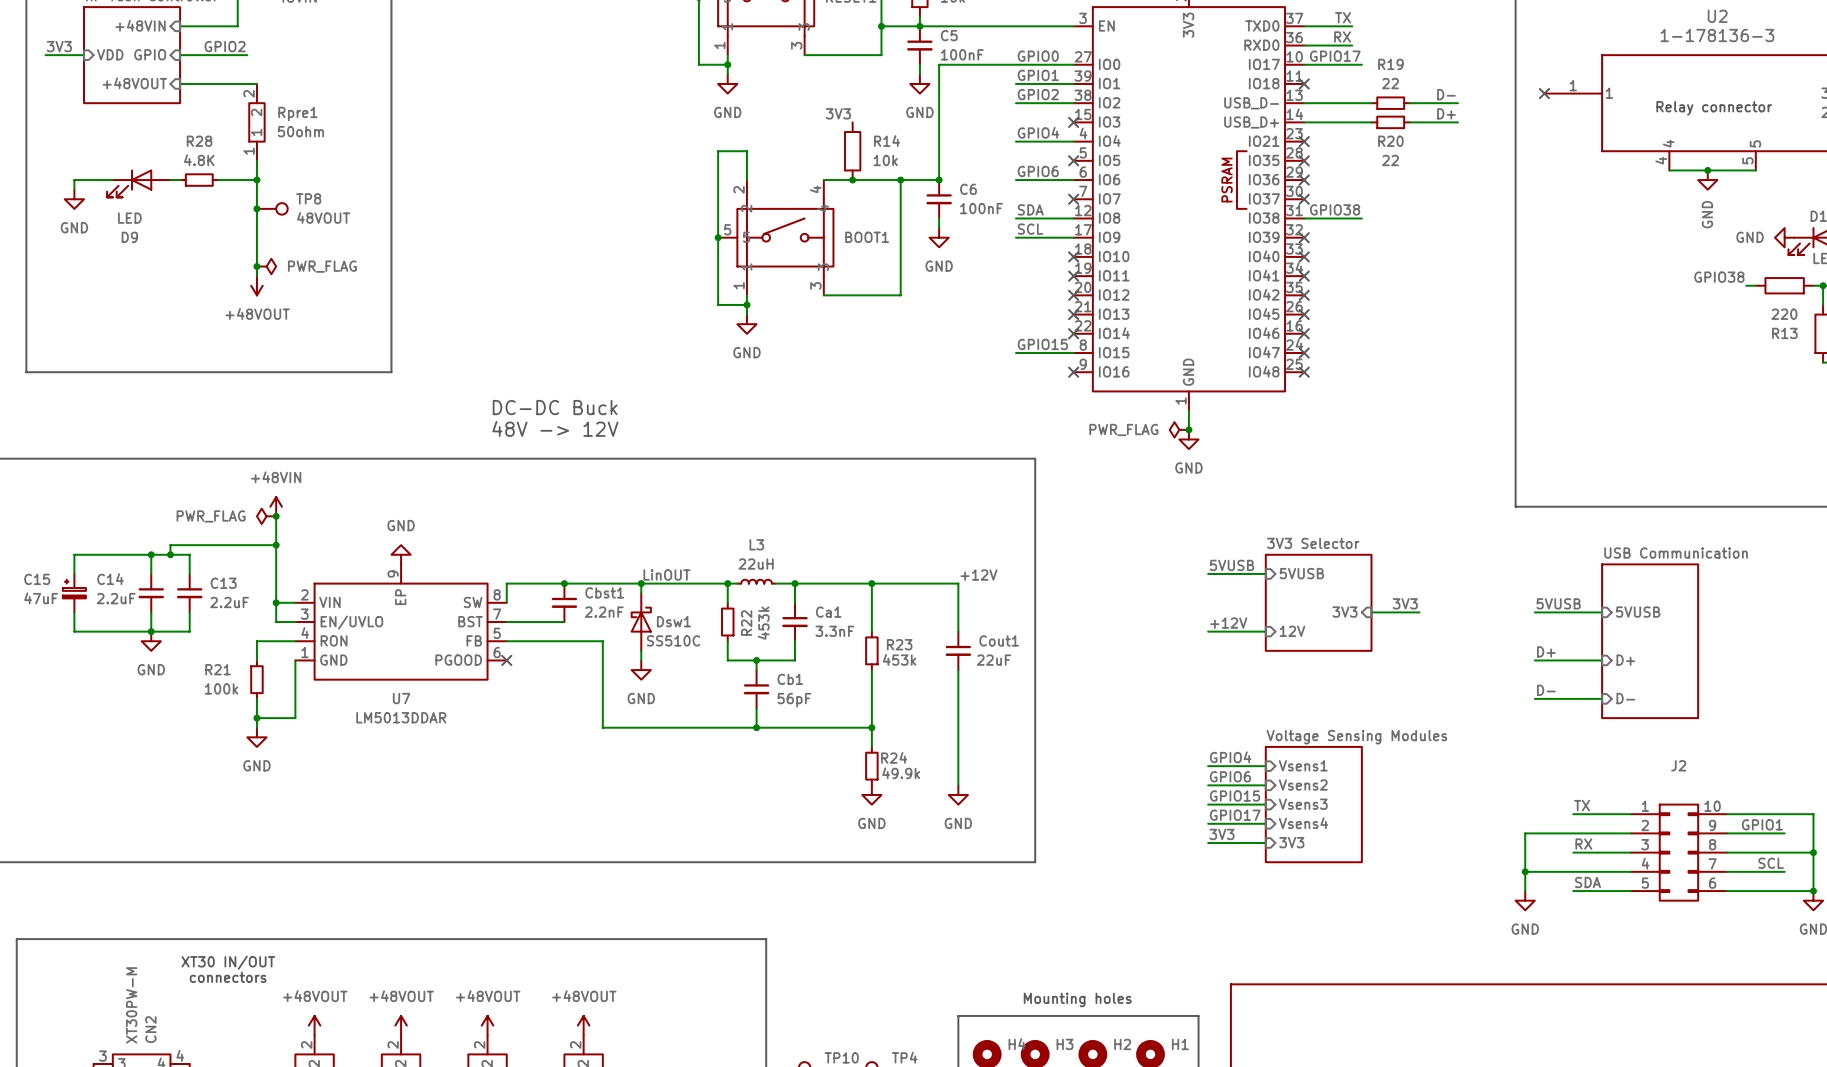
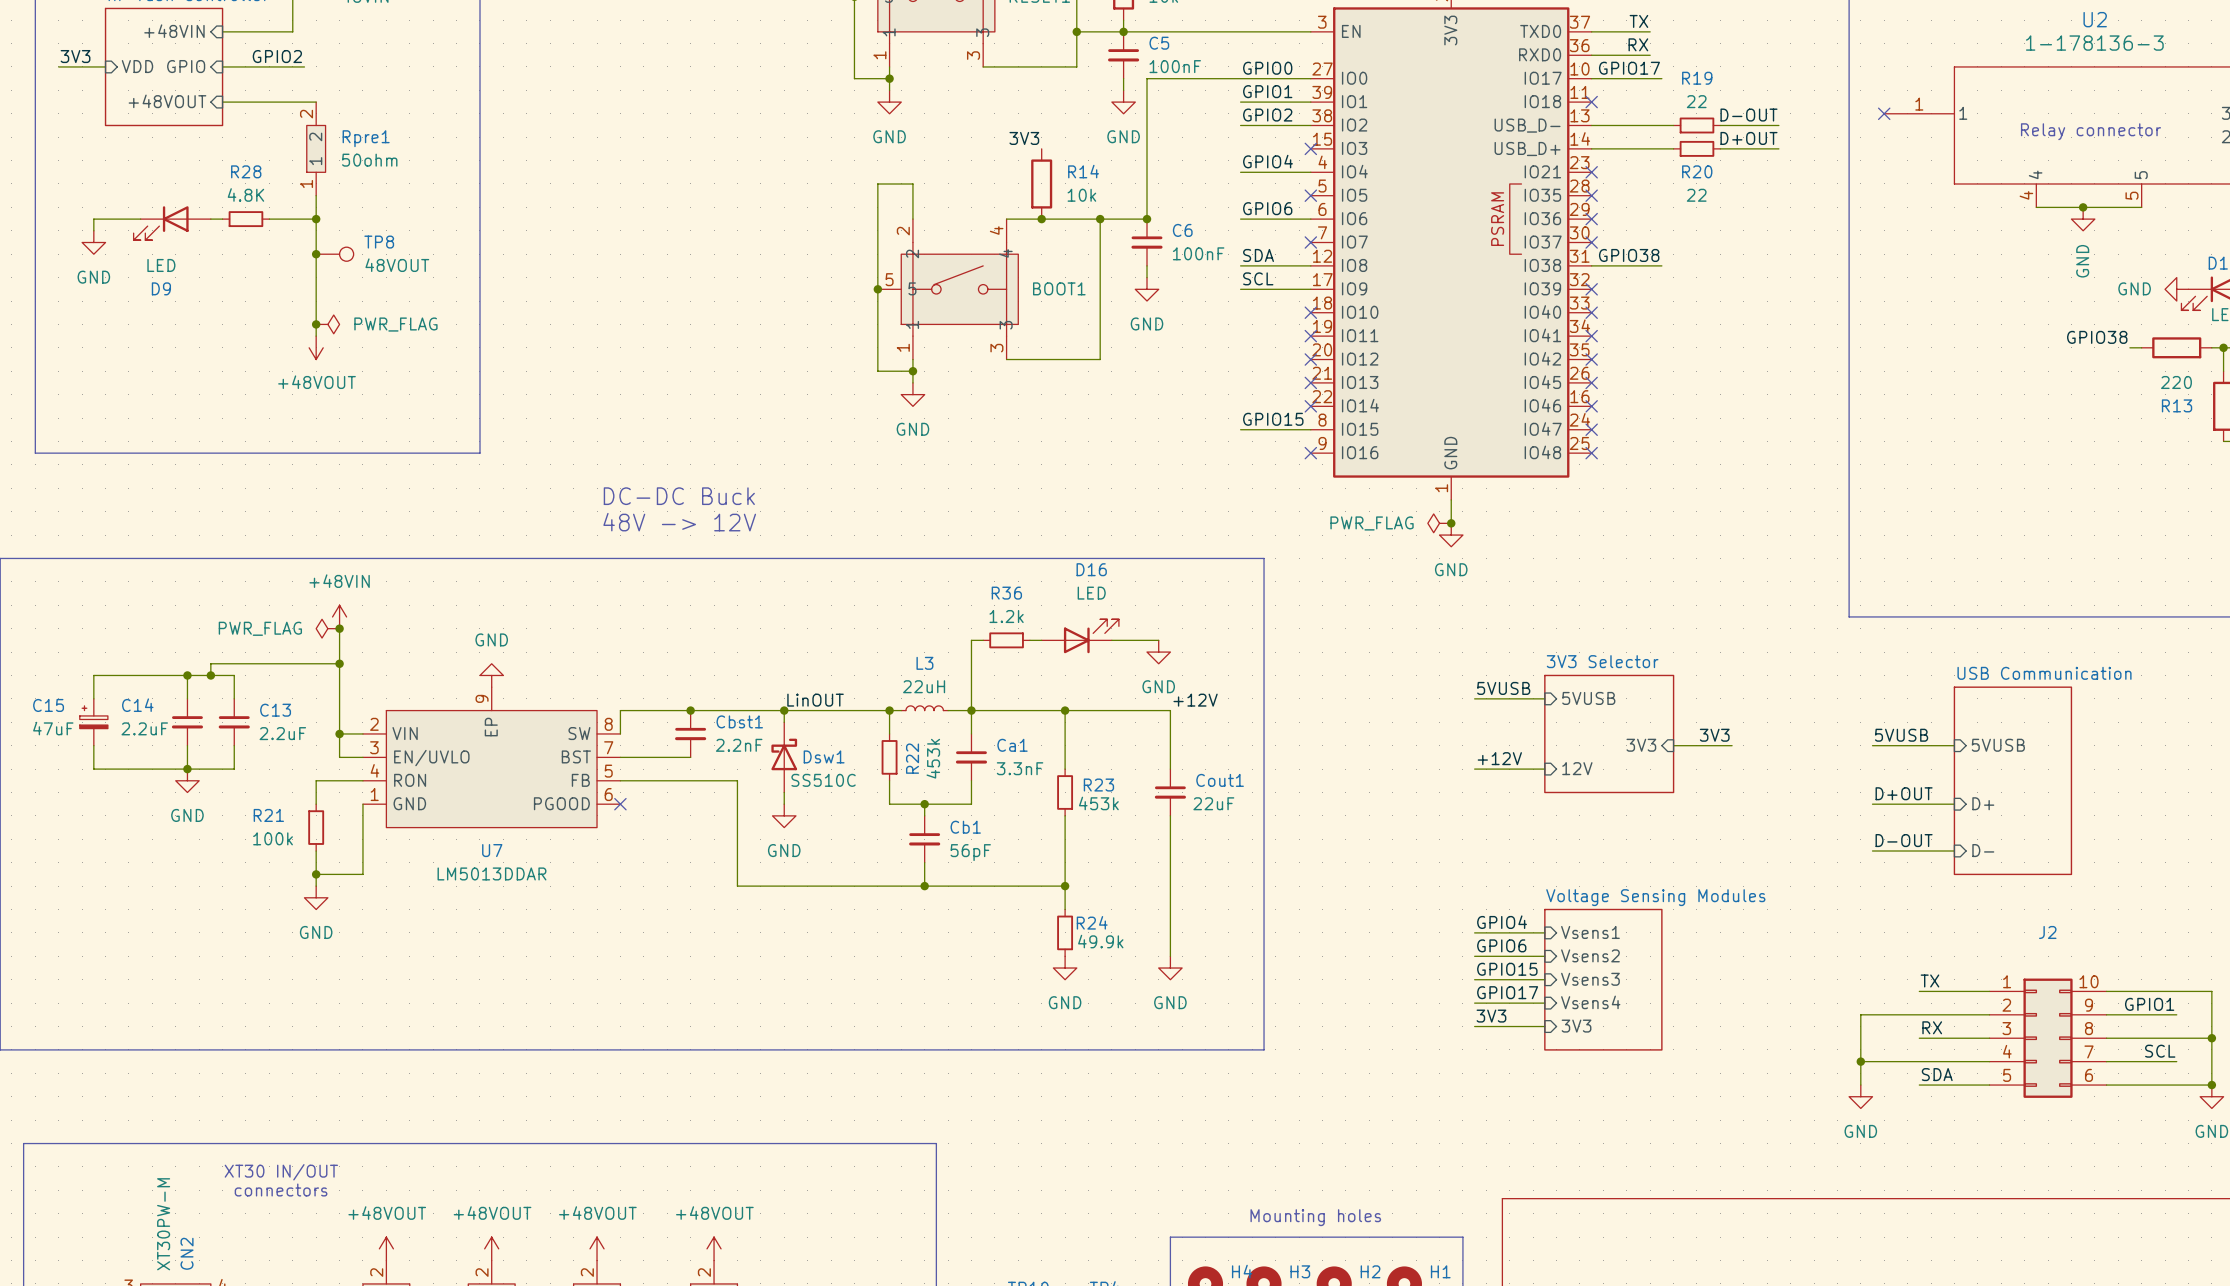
label: D- (1446, 94) -> D-OUT (1748, 115)
label: D+ (1446, 113) -> D+OUT (1748, 138)
D16: none -> LED (1080, 636)
wire: none -> (983, 640) (971, 640) (971, 710)
R36: none -> 1.2k (1006, 640)
wire: none -> (1029, 640) (1041, 640)
wire: none -> (1111, 640) (1158, 640)
power symbol: none -> GND (1158, 652)
label: D+ (1546, 651) -> D+OUT (1904, 793)
label: D- (1546, 690) -> D-OUT (1904, 840)

